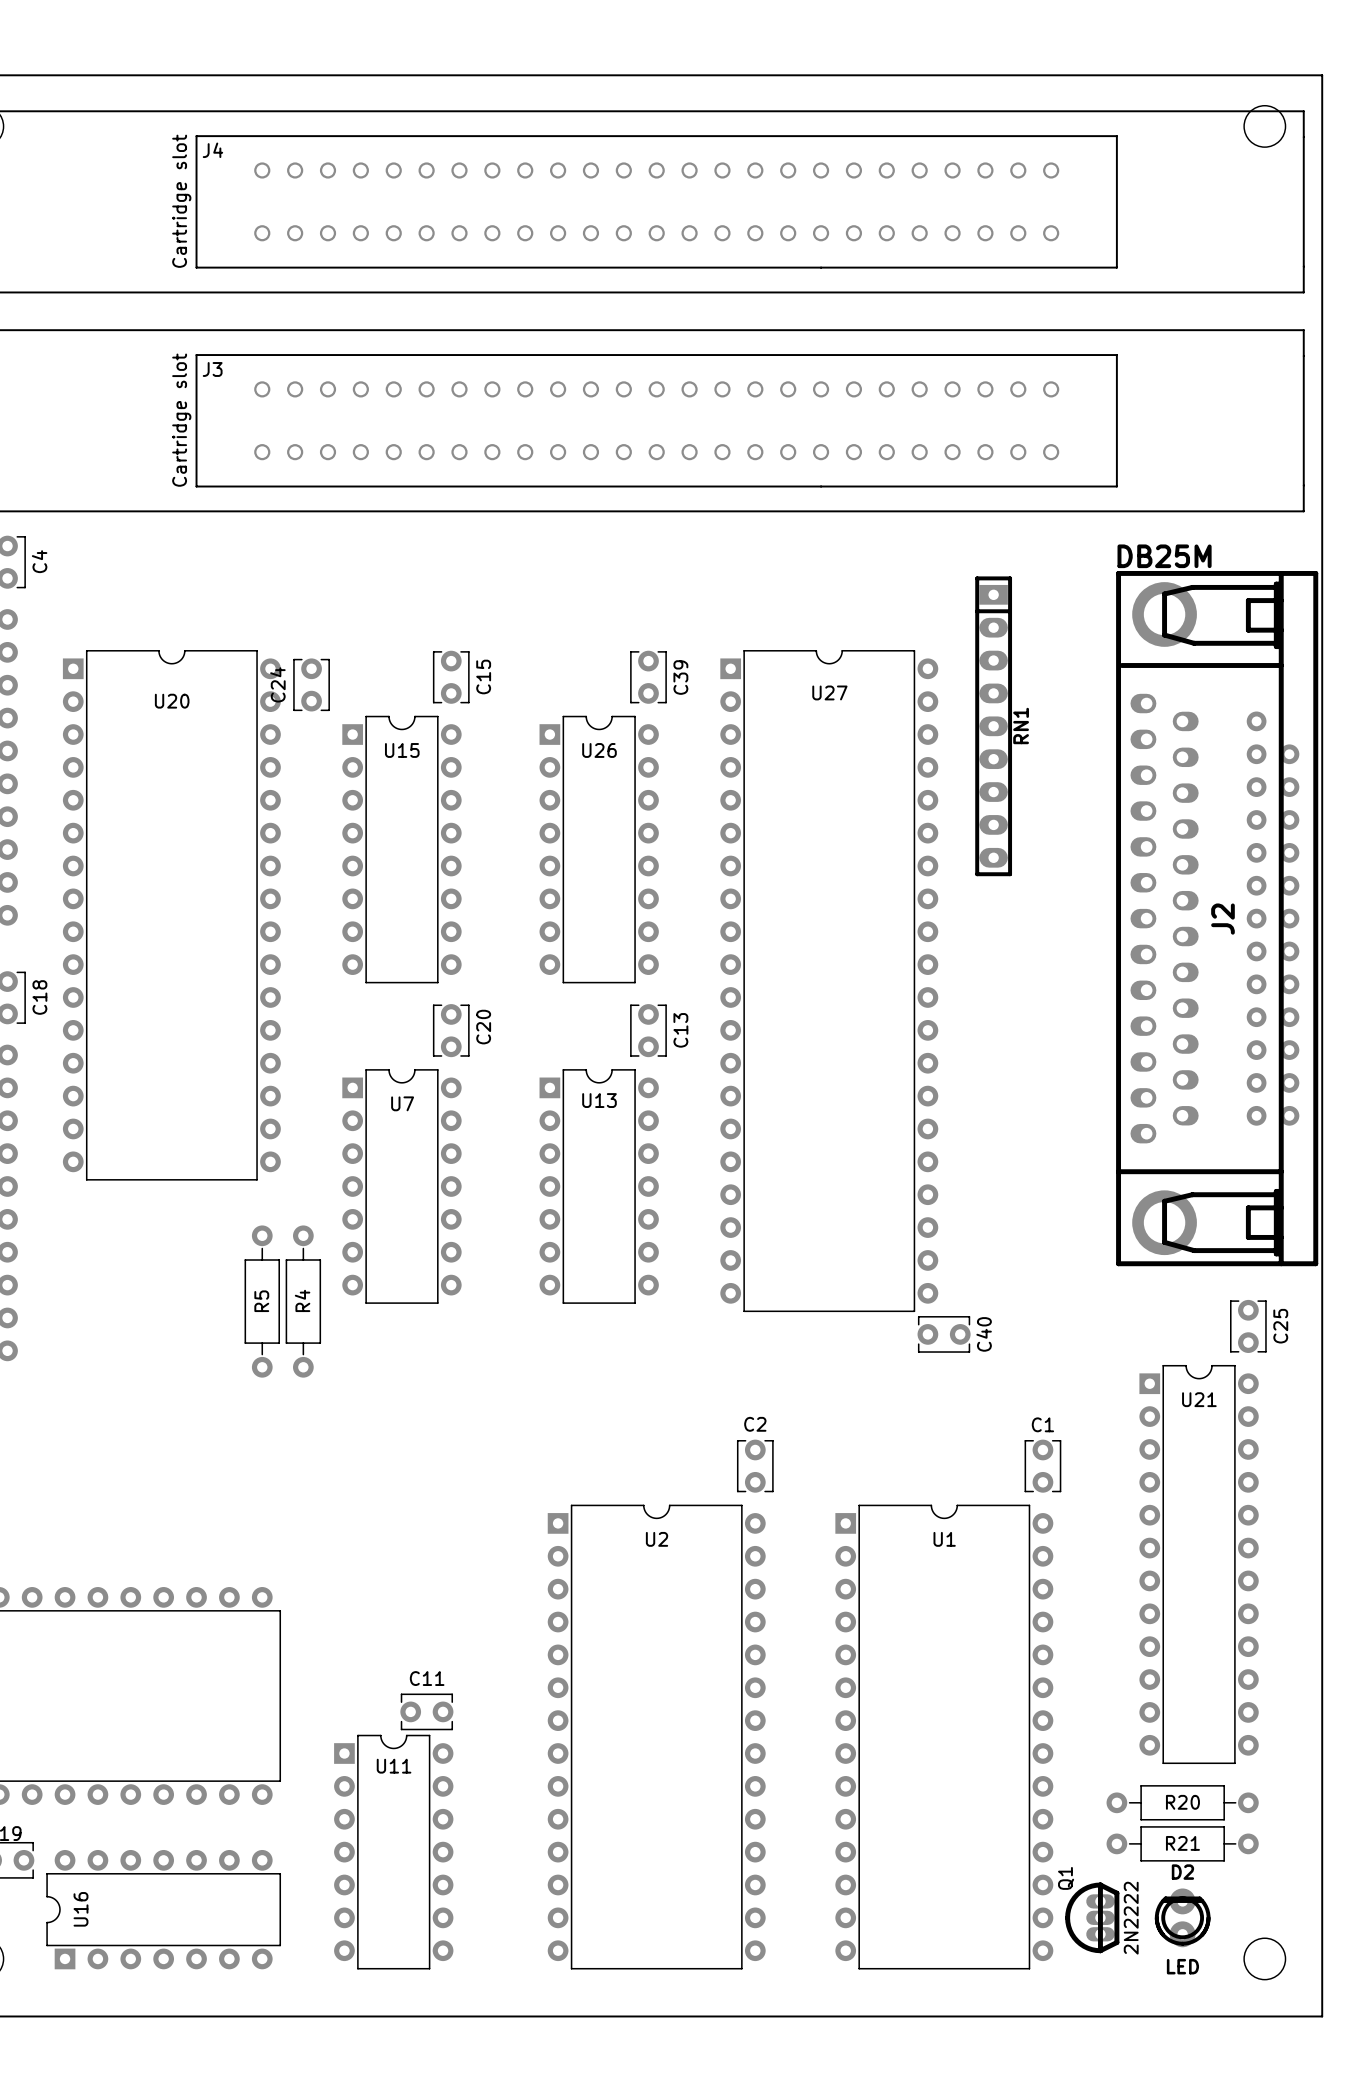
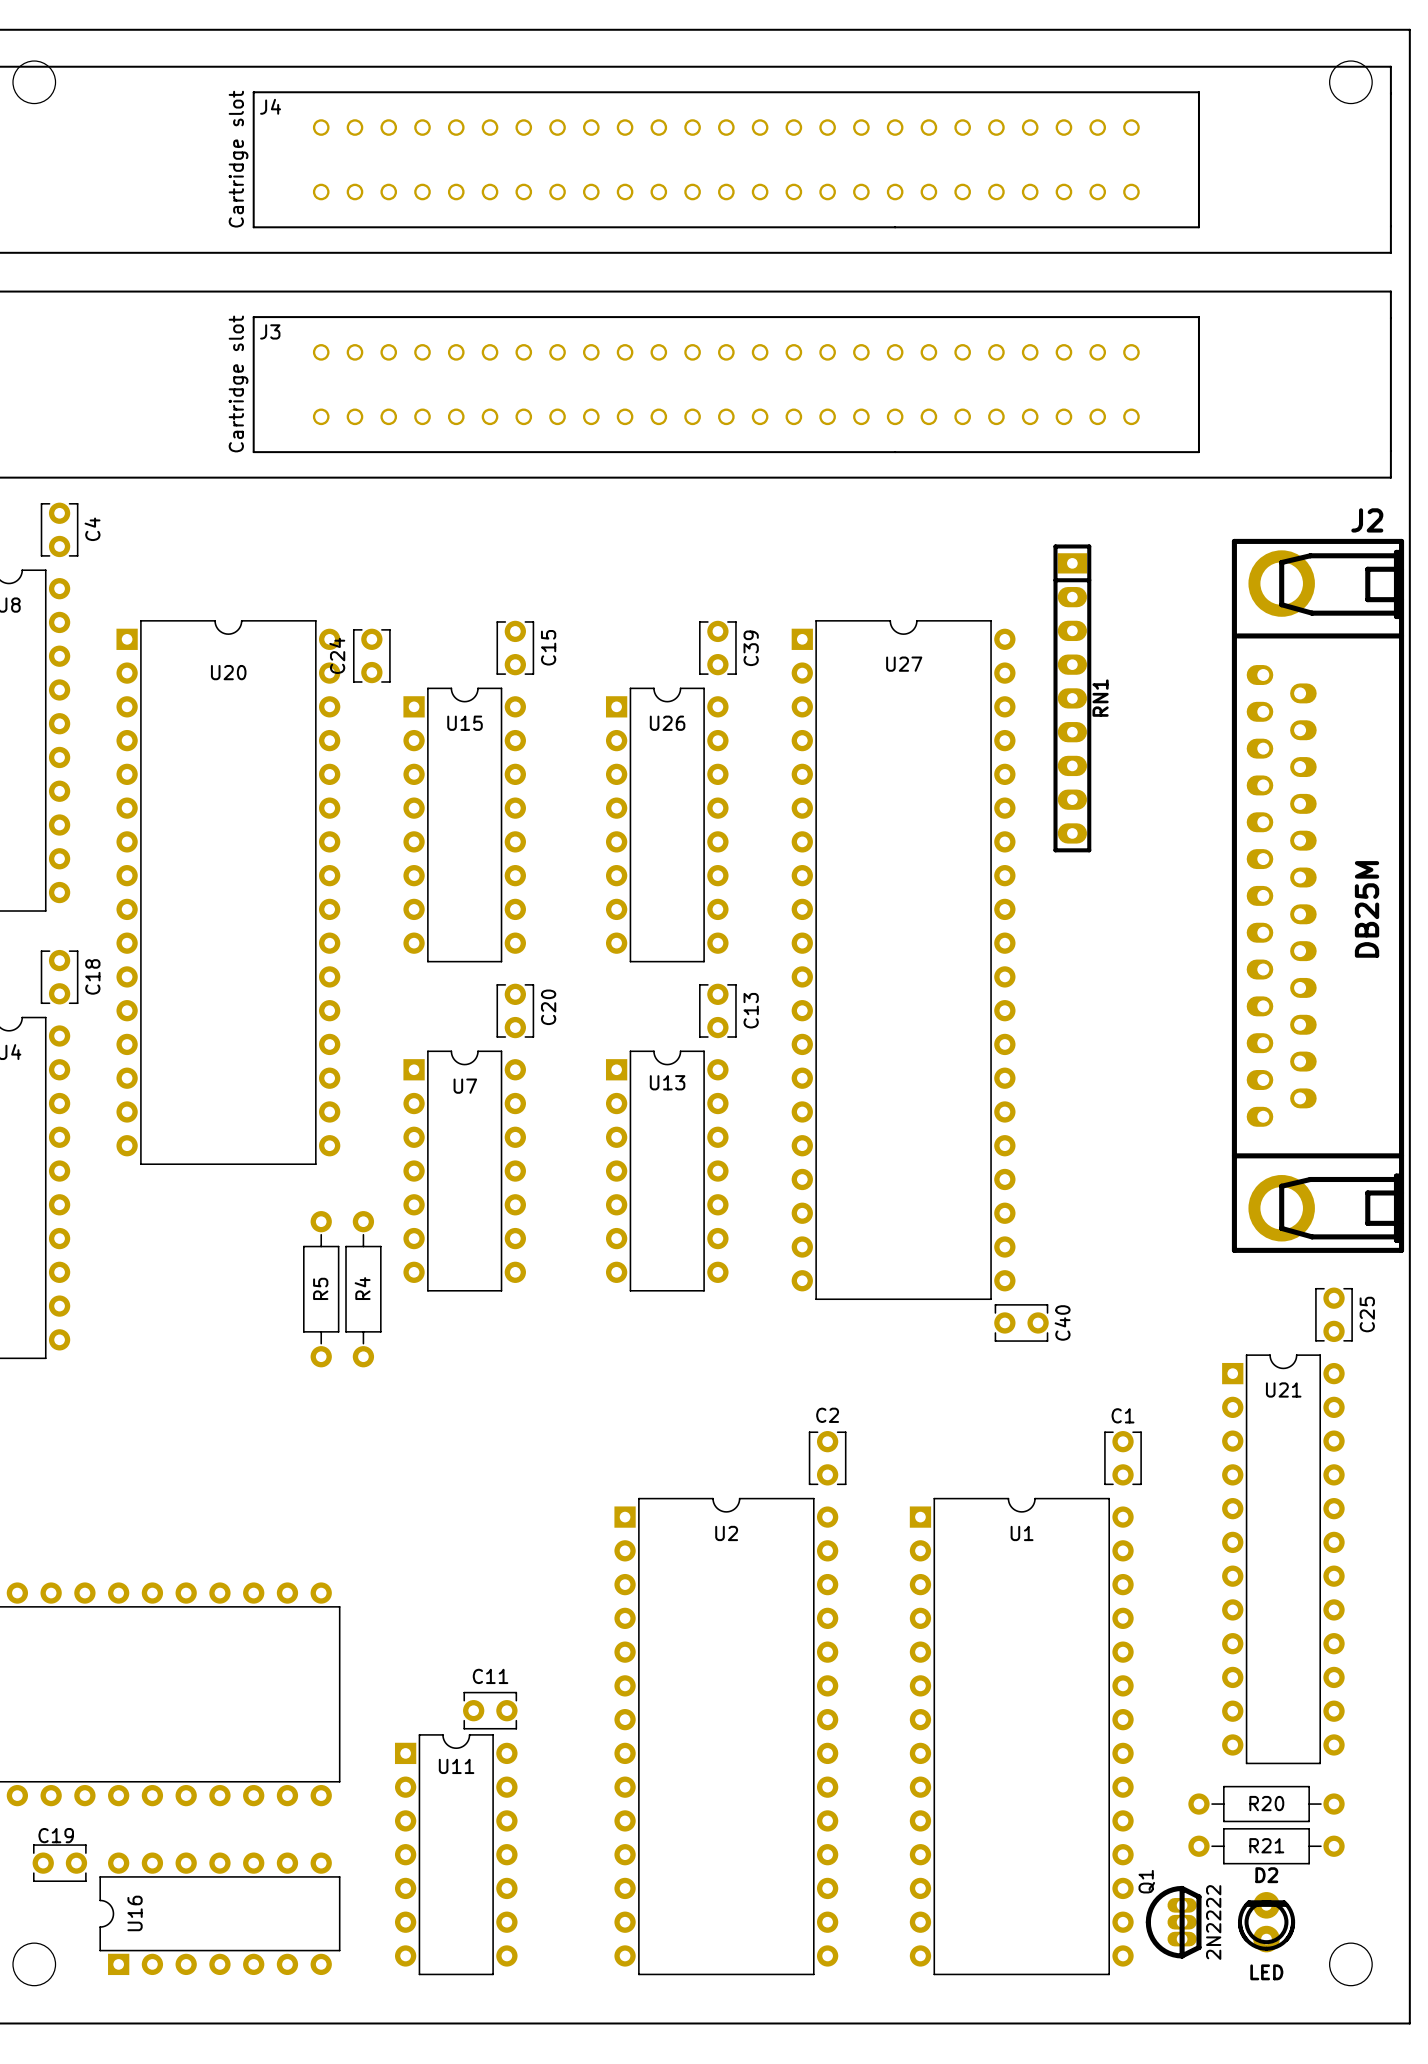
J2 value position: DB25M (1164, 556) -> DB25M (1367, 909)
J2 footprint: [1116, 570, 1319, 1267] -> [1231, 538, 1405, 1253]
J2 name position: J2 (1222, 919) -> J2 (1367, 520)

